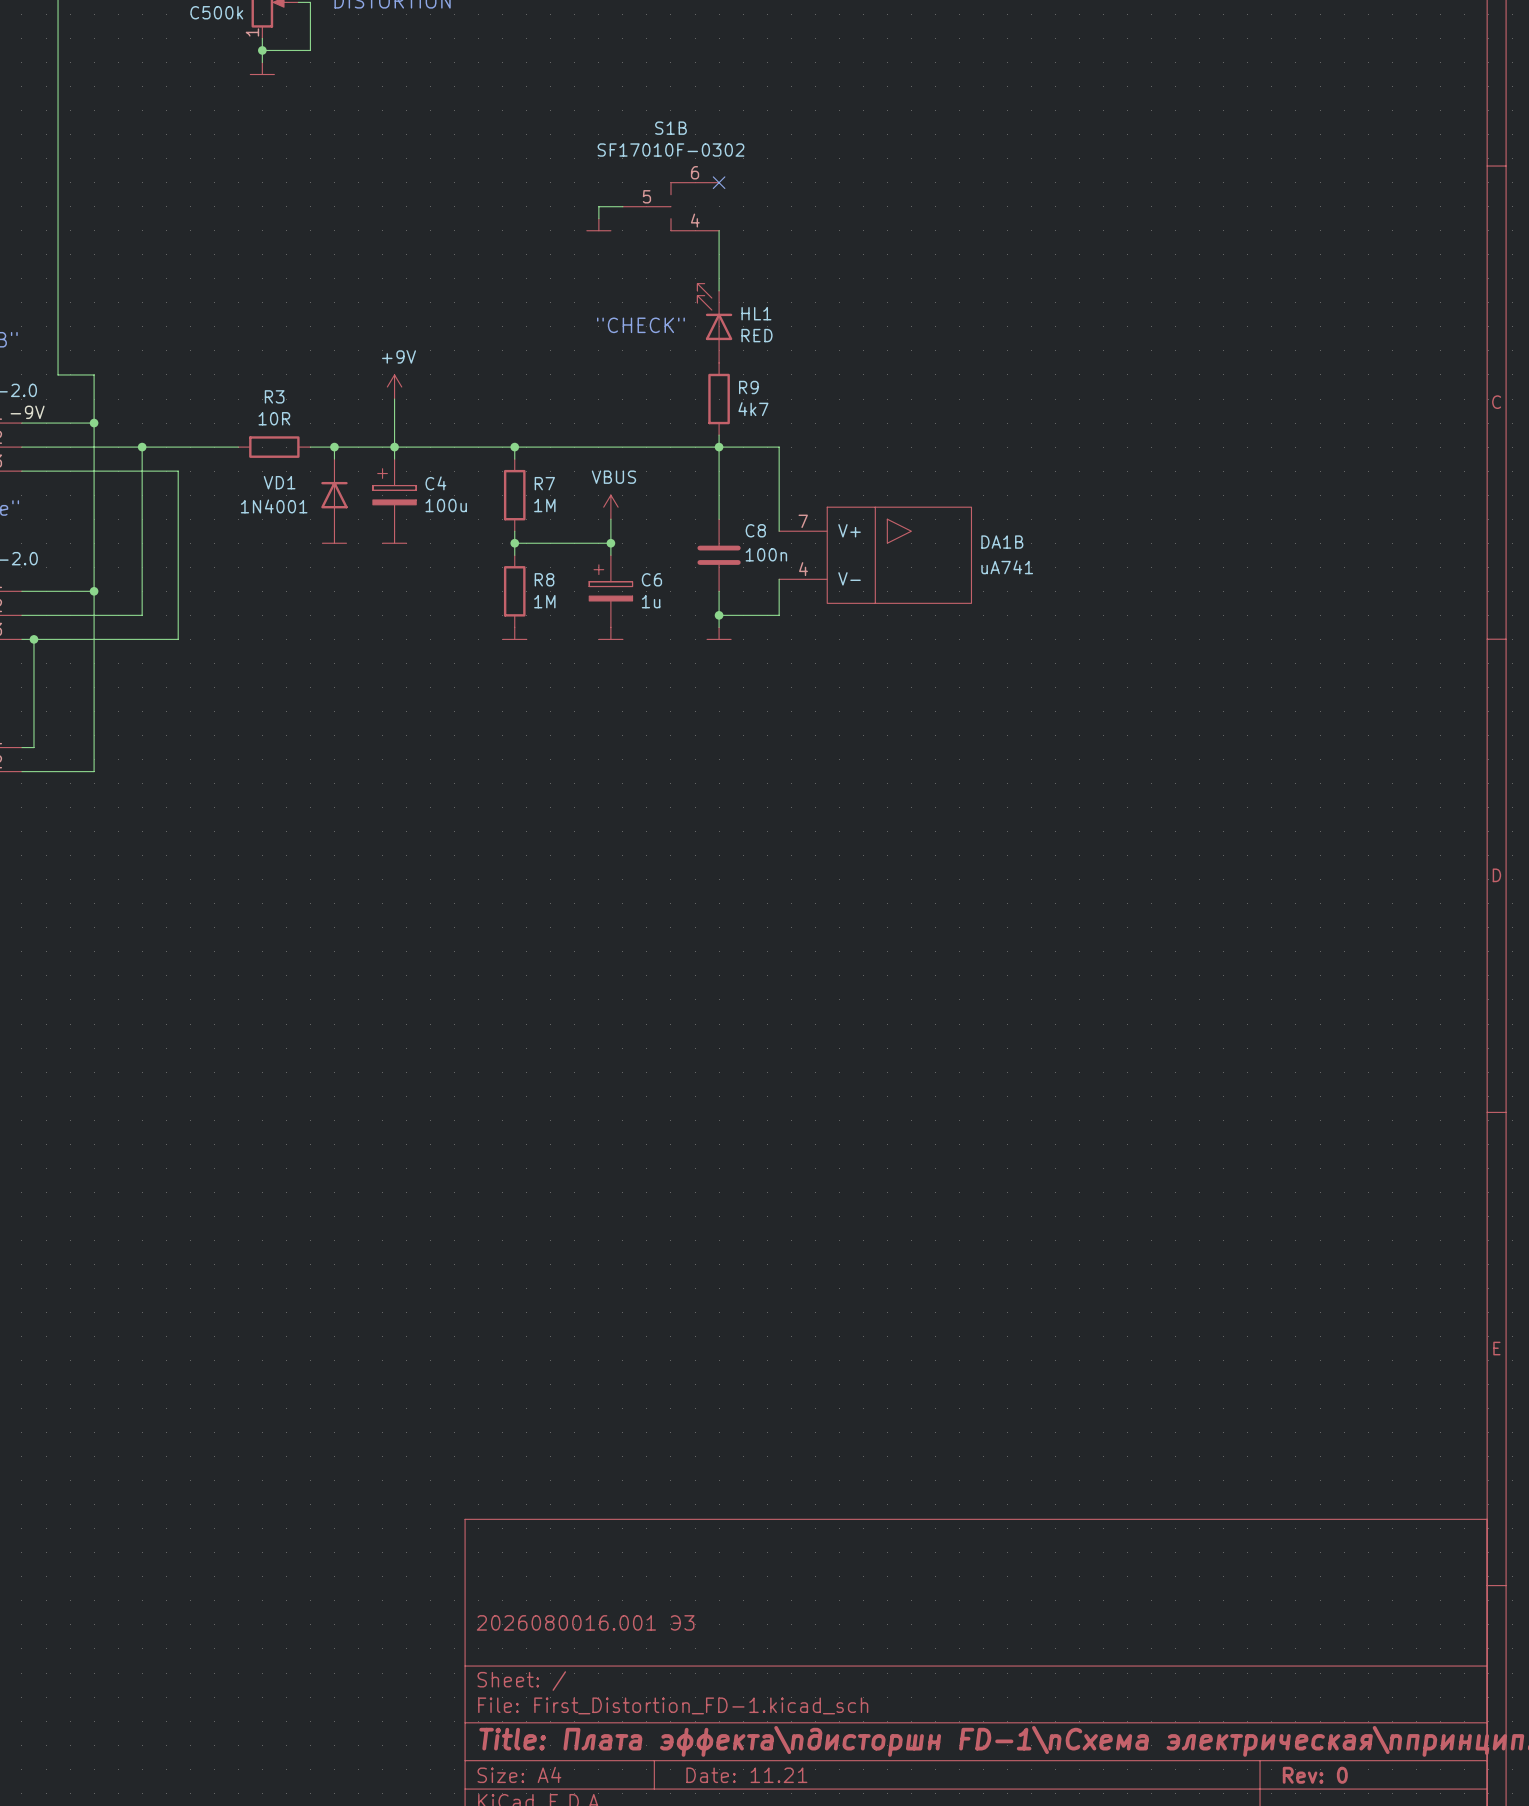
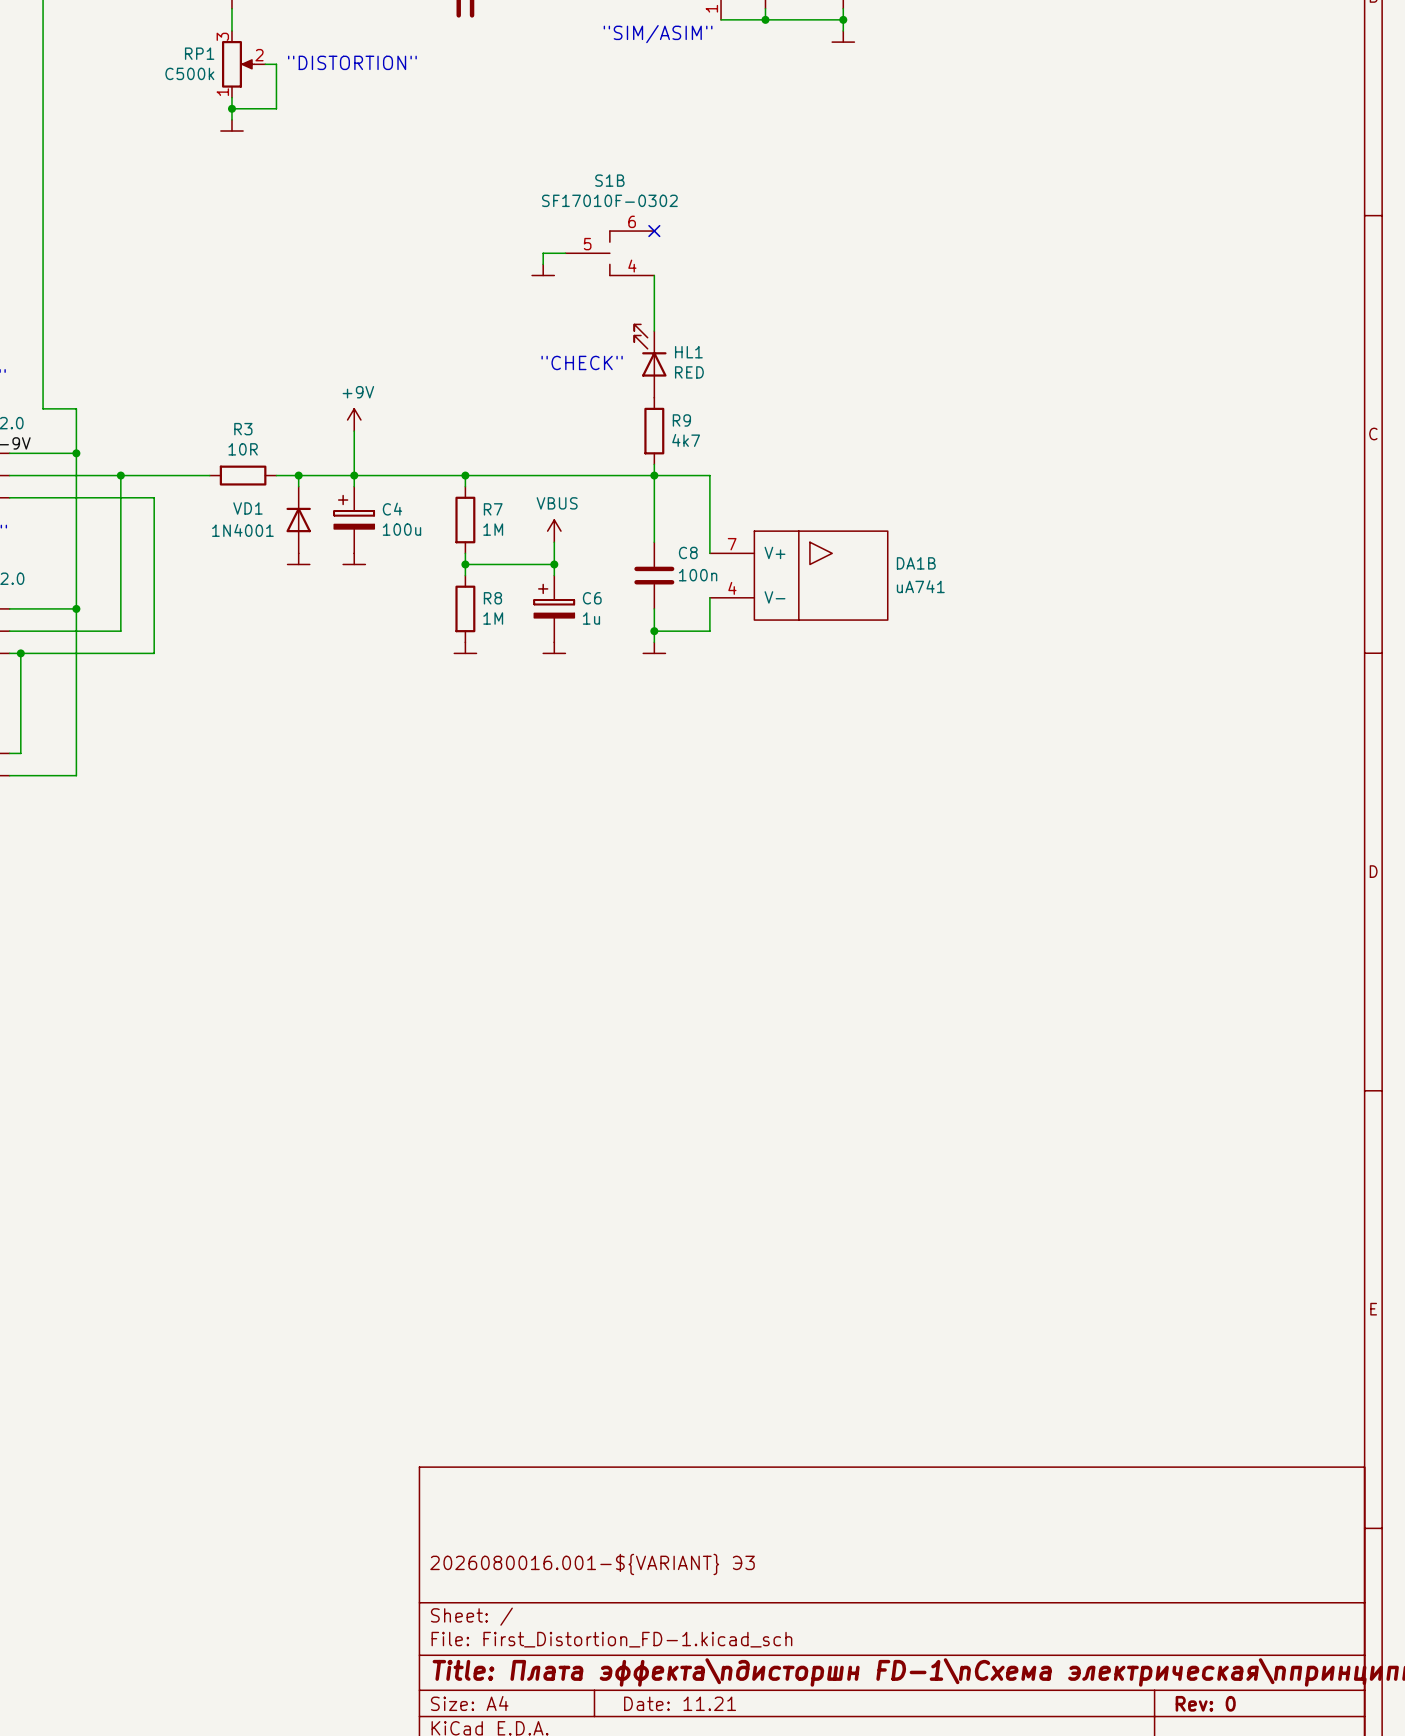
title block: 2026080016.001 Э3 (585, 1622) -> 2026080016.001-${VARIANT} Э3 (592, 1564)

